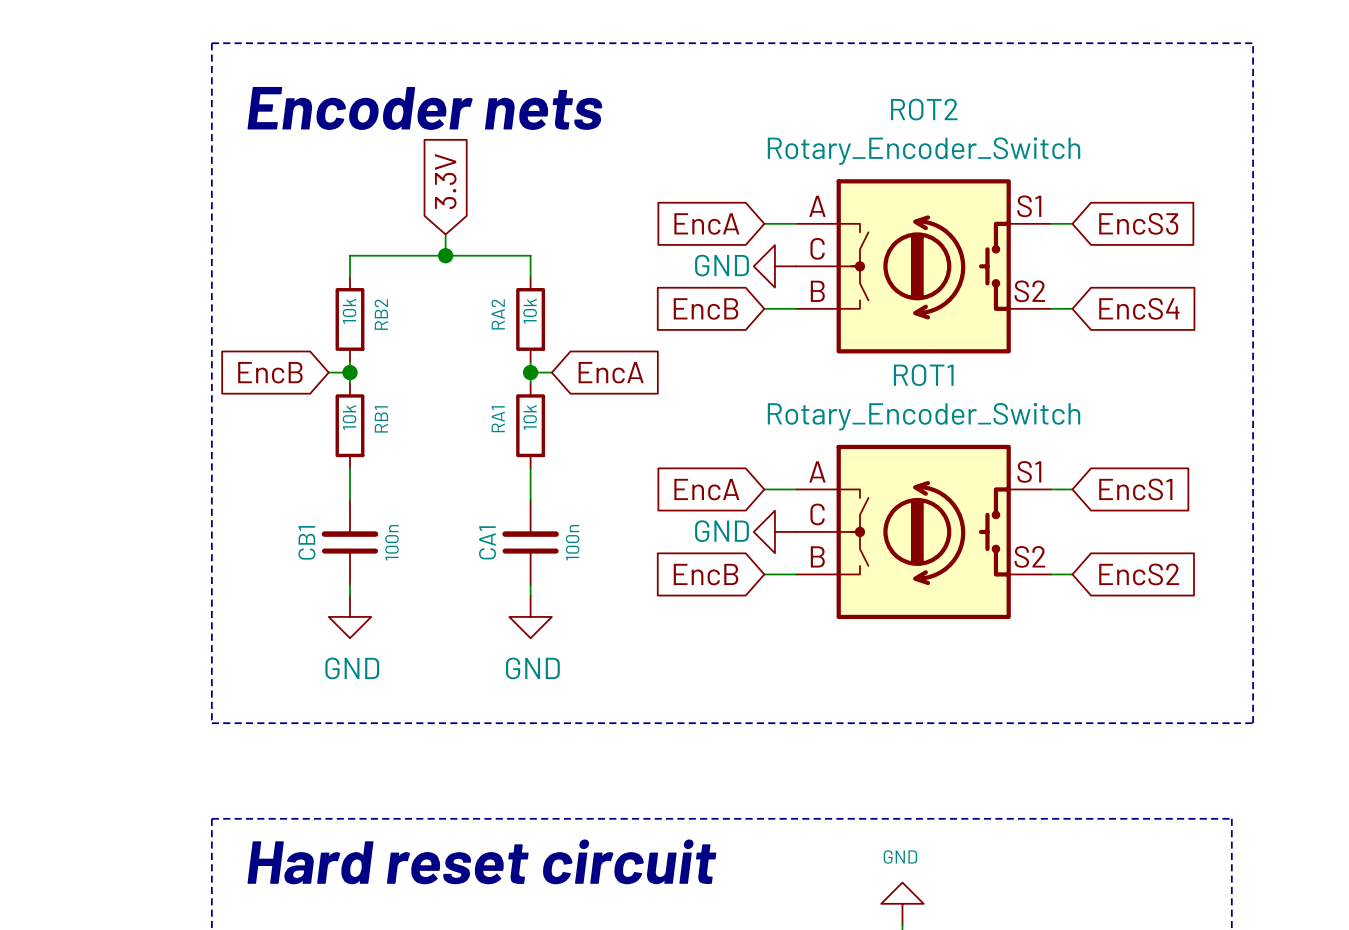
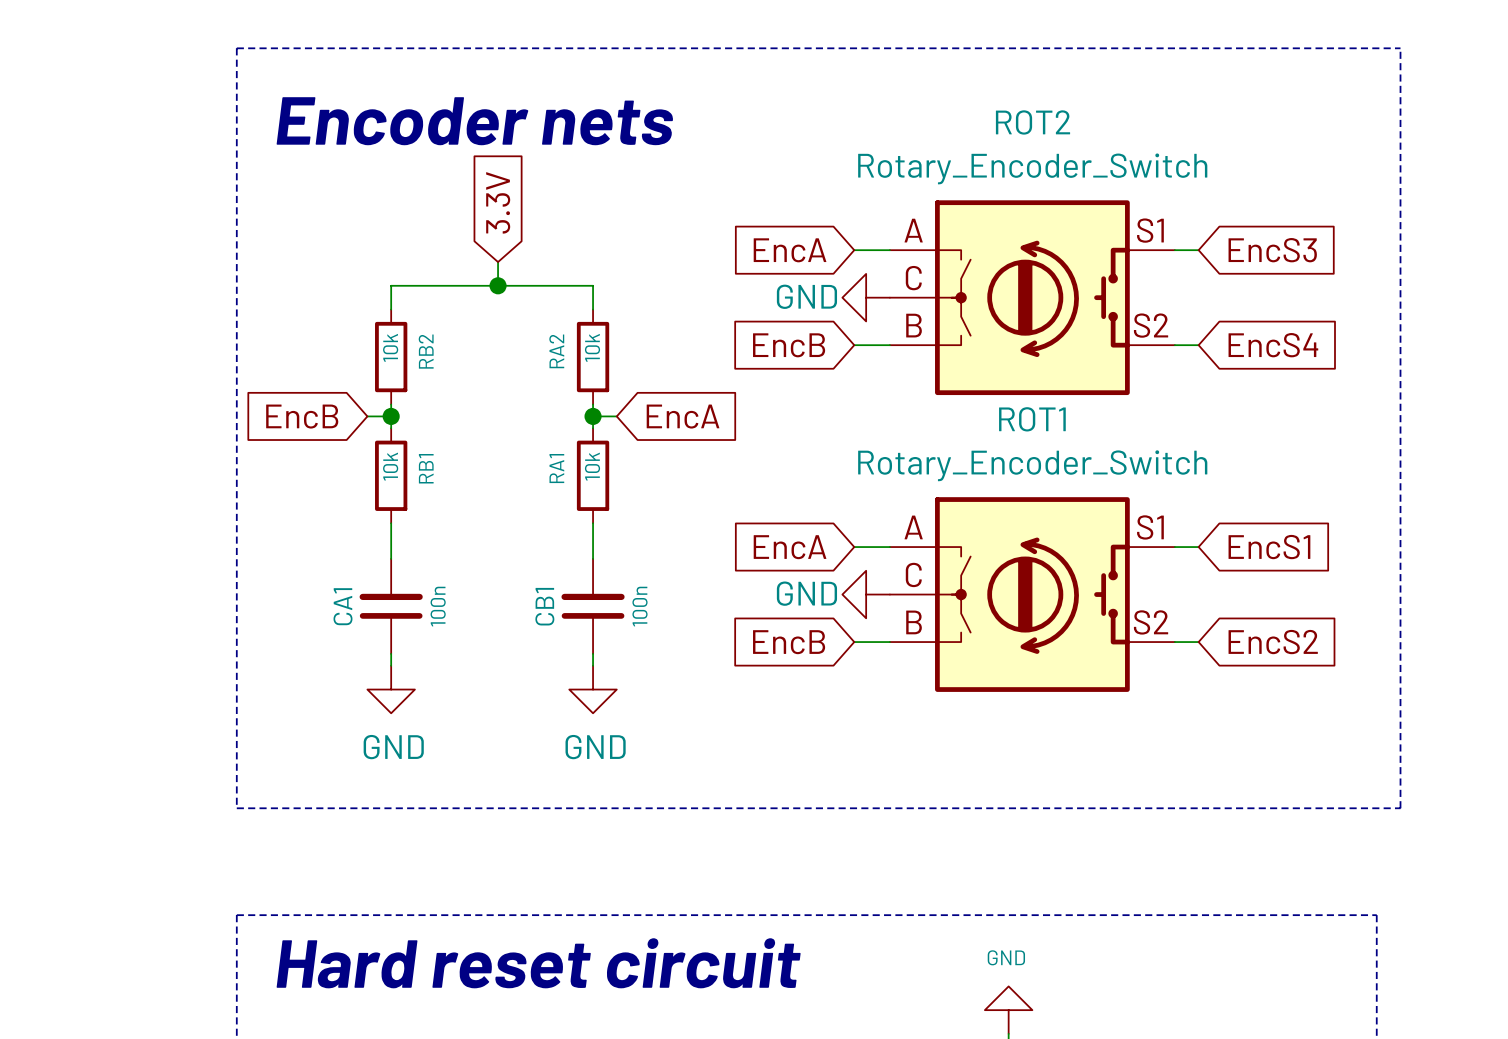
CB1 name: CB1 (306, 542) -> CA1 (342, 606)
CA1 name: CA1 (487, 542) -> CB1 (544, 606)

